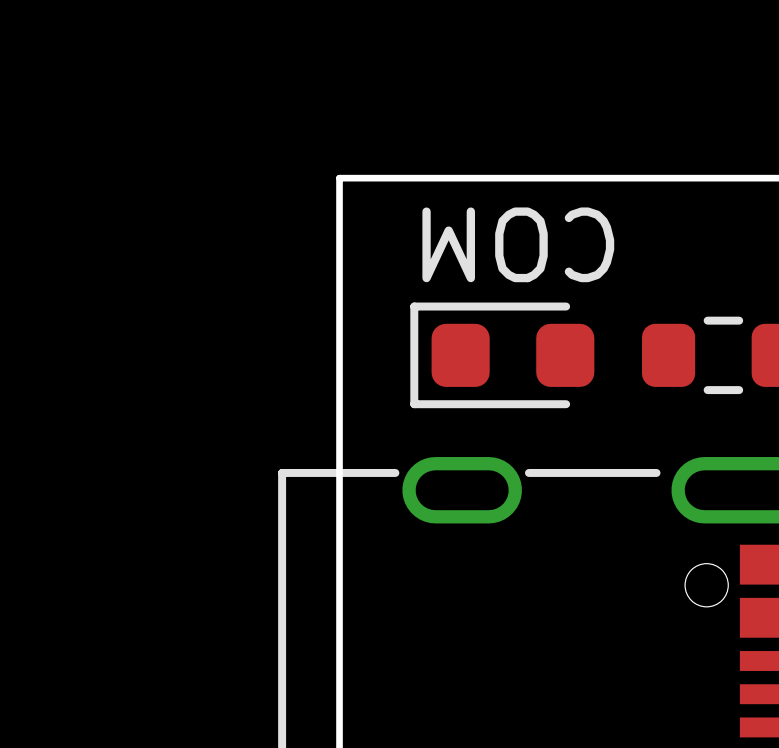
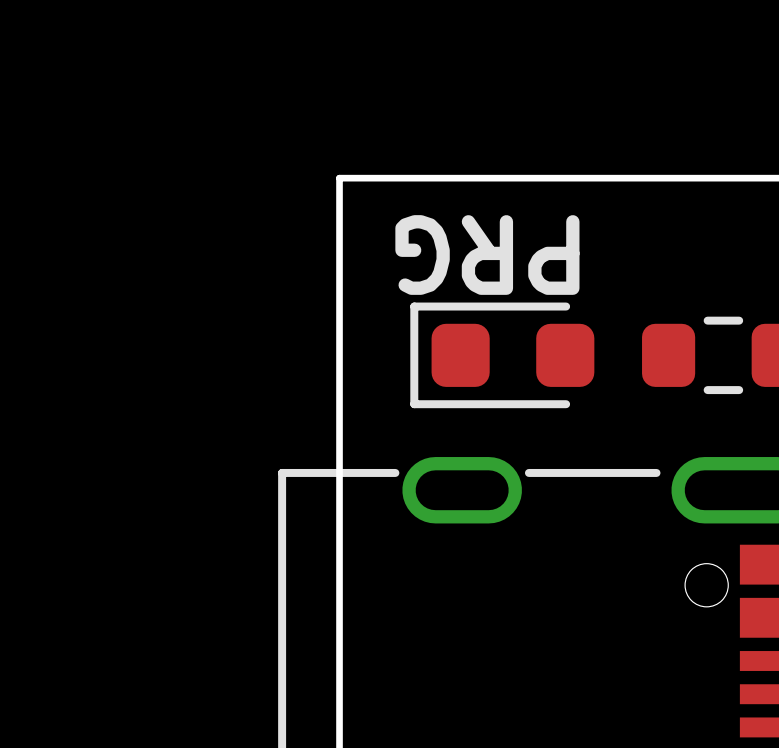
text: COM (518, 244) -> PRG (487, 254)

